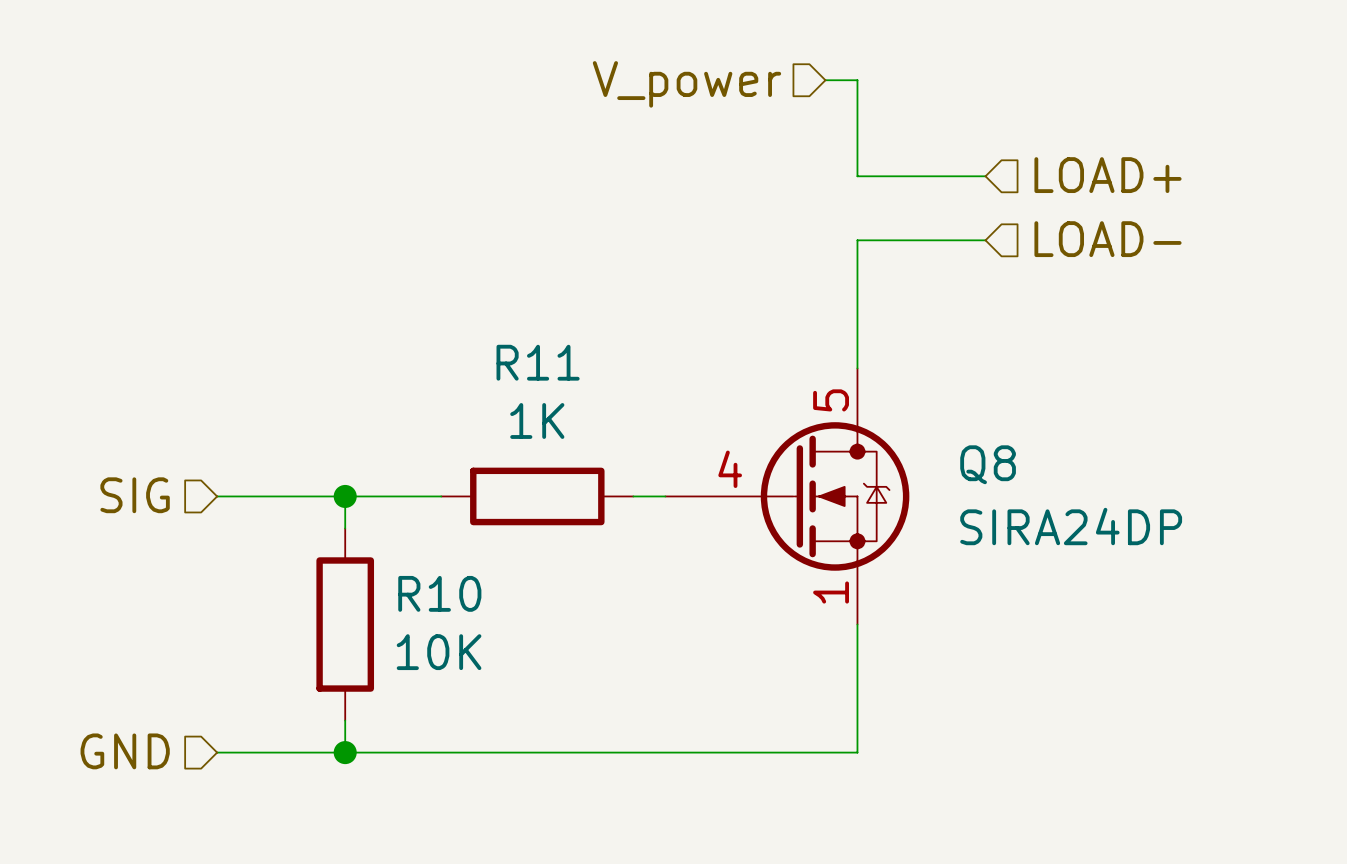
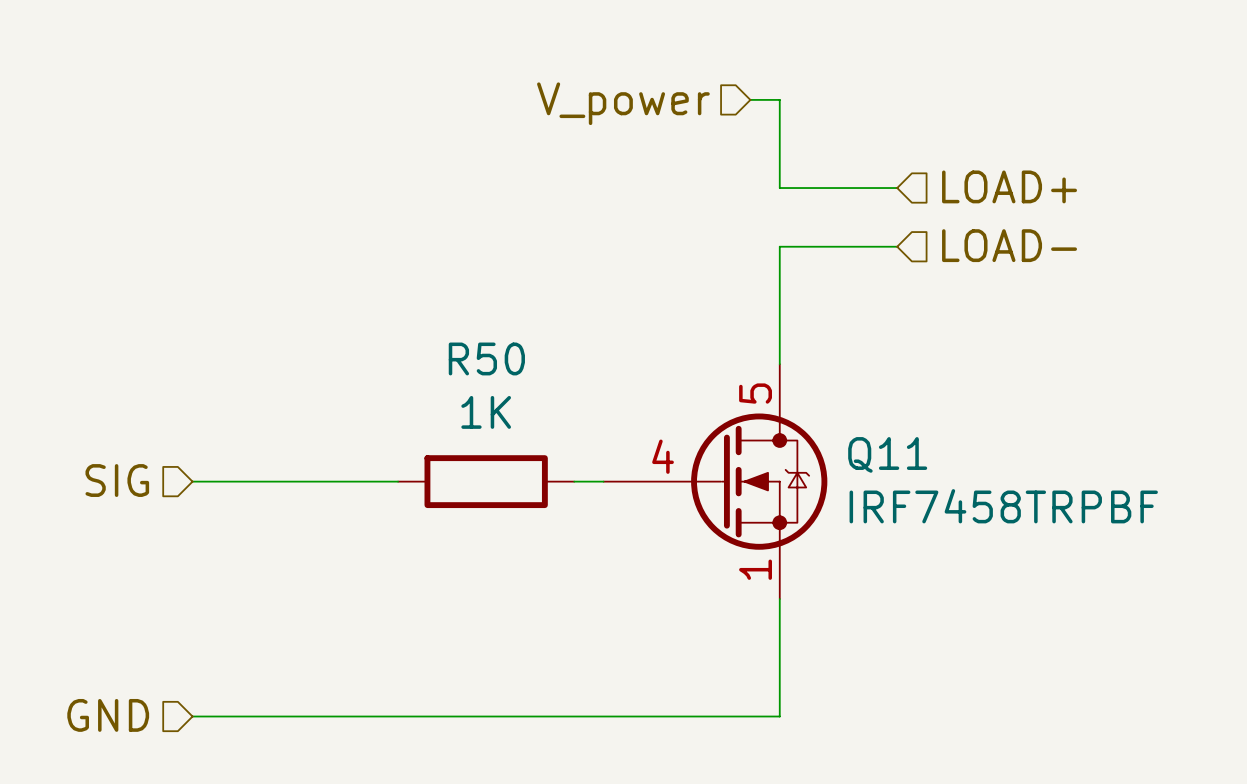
R11 name: R11 (538, 362) -> R50 (486, 358)
Q8 name: Q8 (988, 464) -> Q11 (887, 454)
wire: (345, 496) (345, 528) -> none
junction: (345, 496) -> none
Q8 value: SIRA24DP (1071, 526) -> IRF7458TRPBF (1003, 506)
R10: 10K (345, 624) -> none
wire: (345, 720) (345, 752) -> none
junction: (345, 752) -> none

